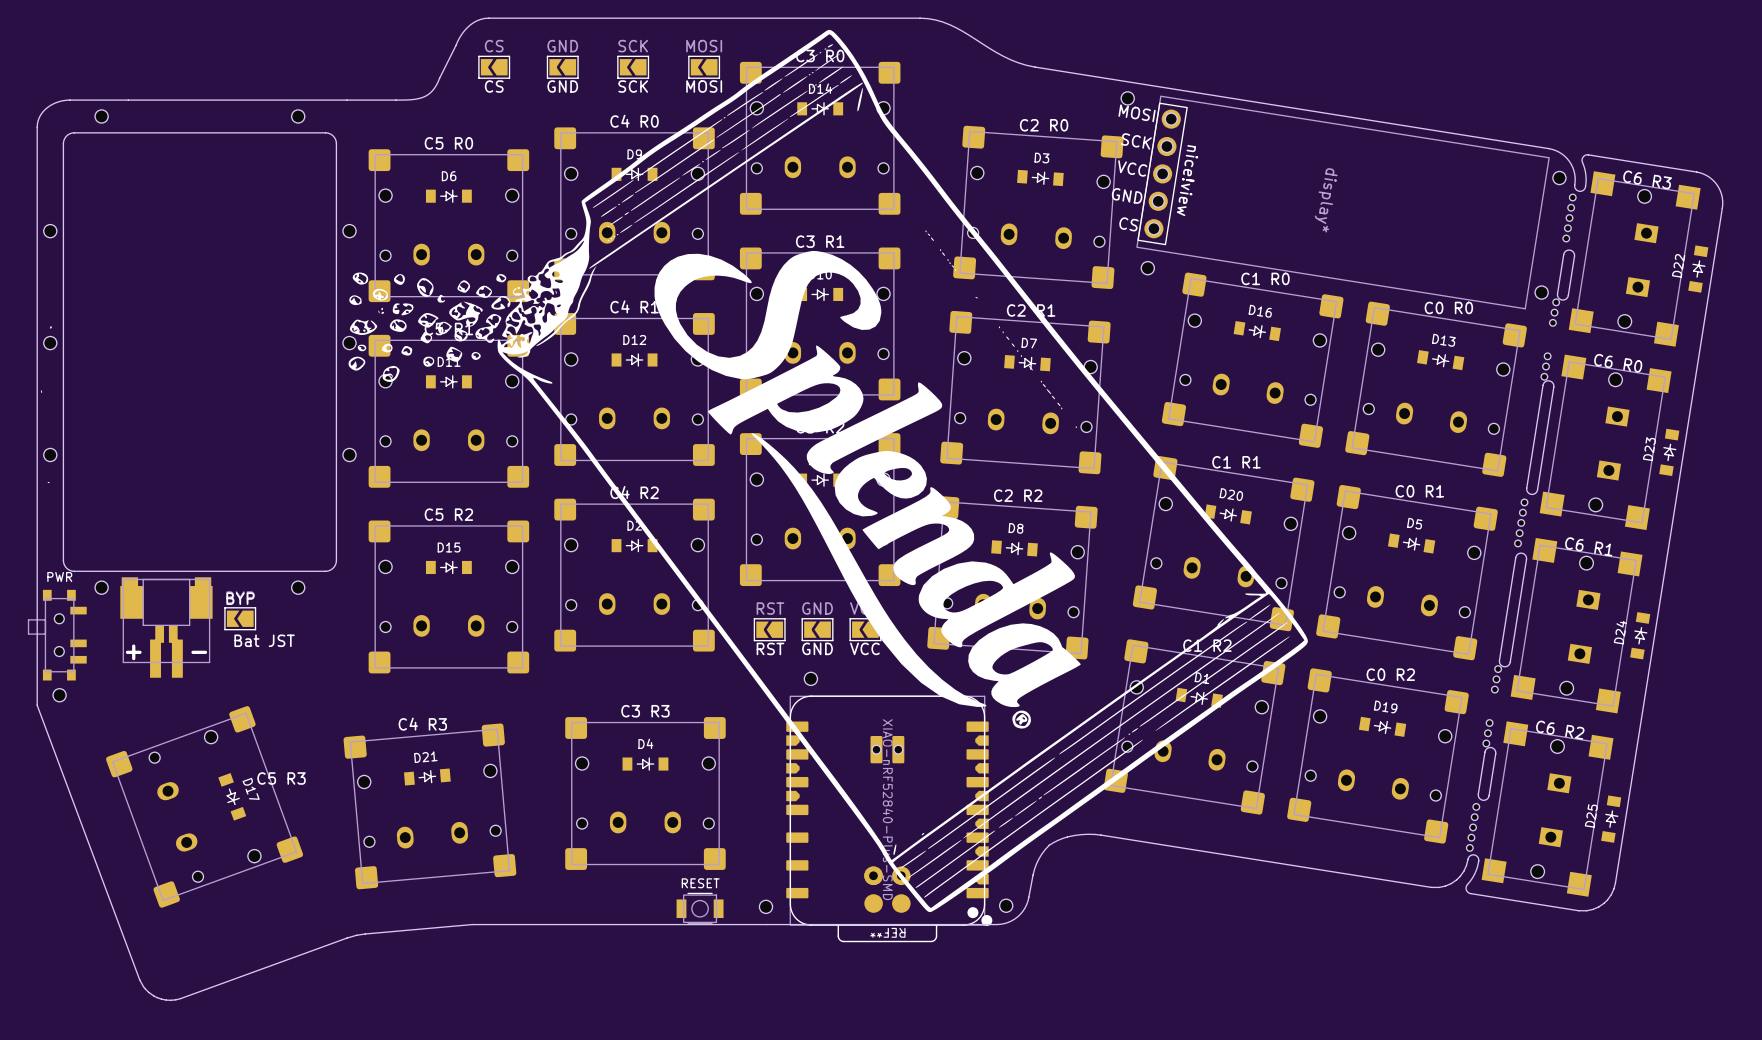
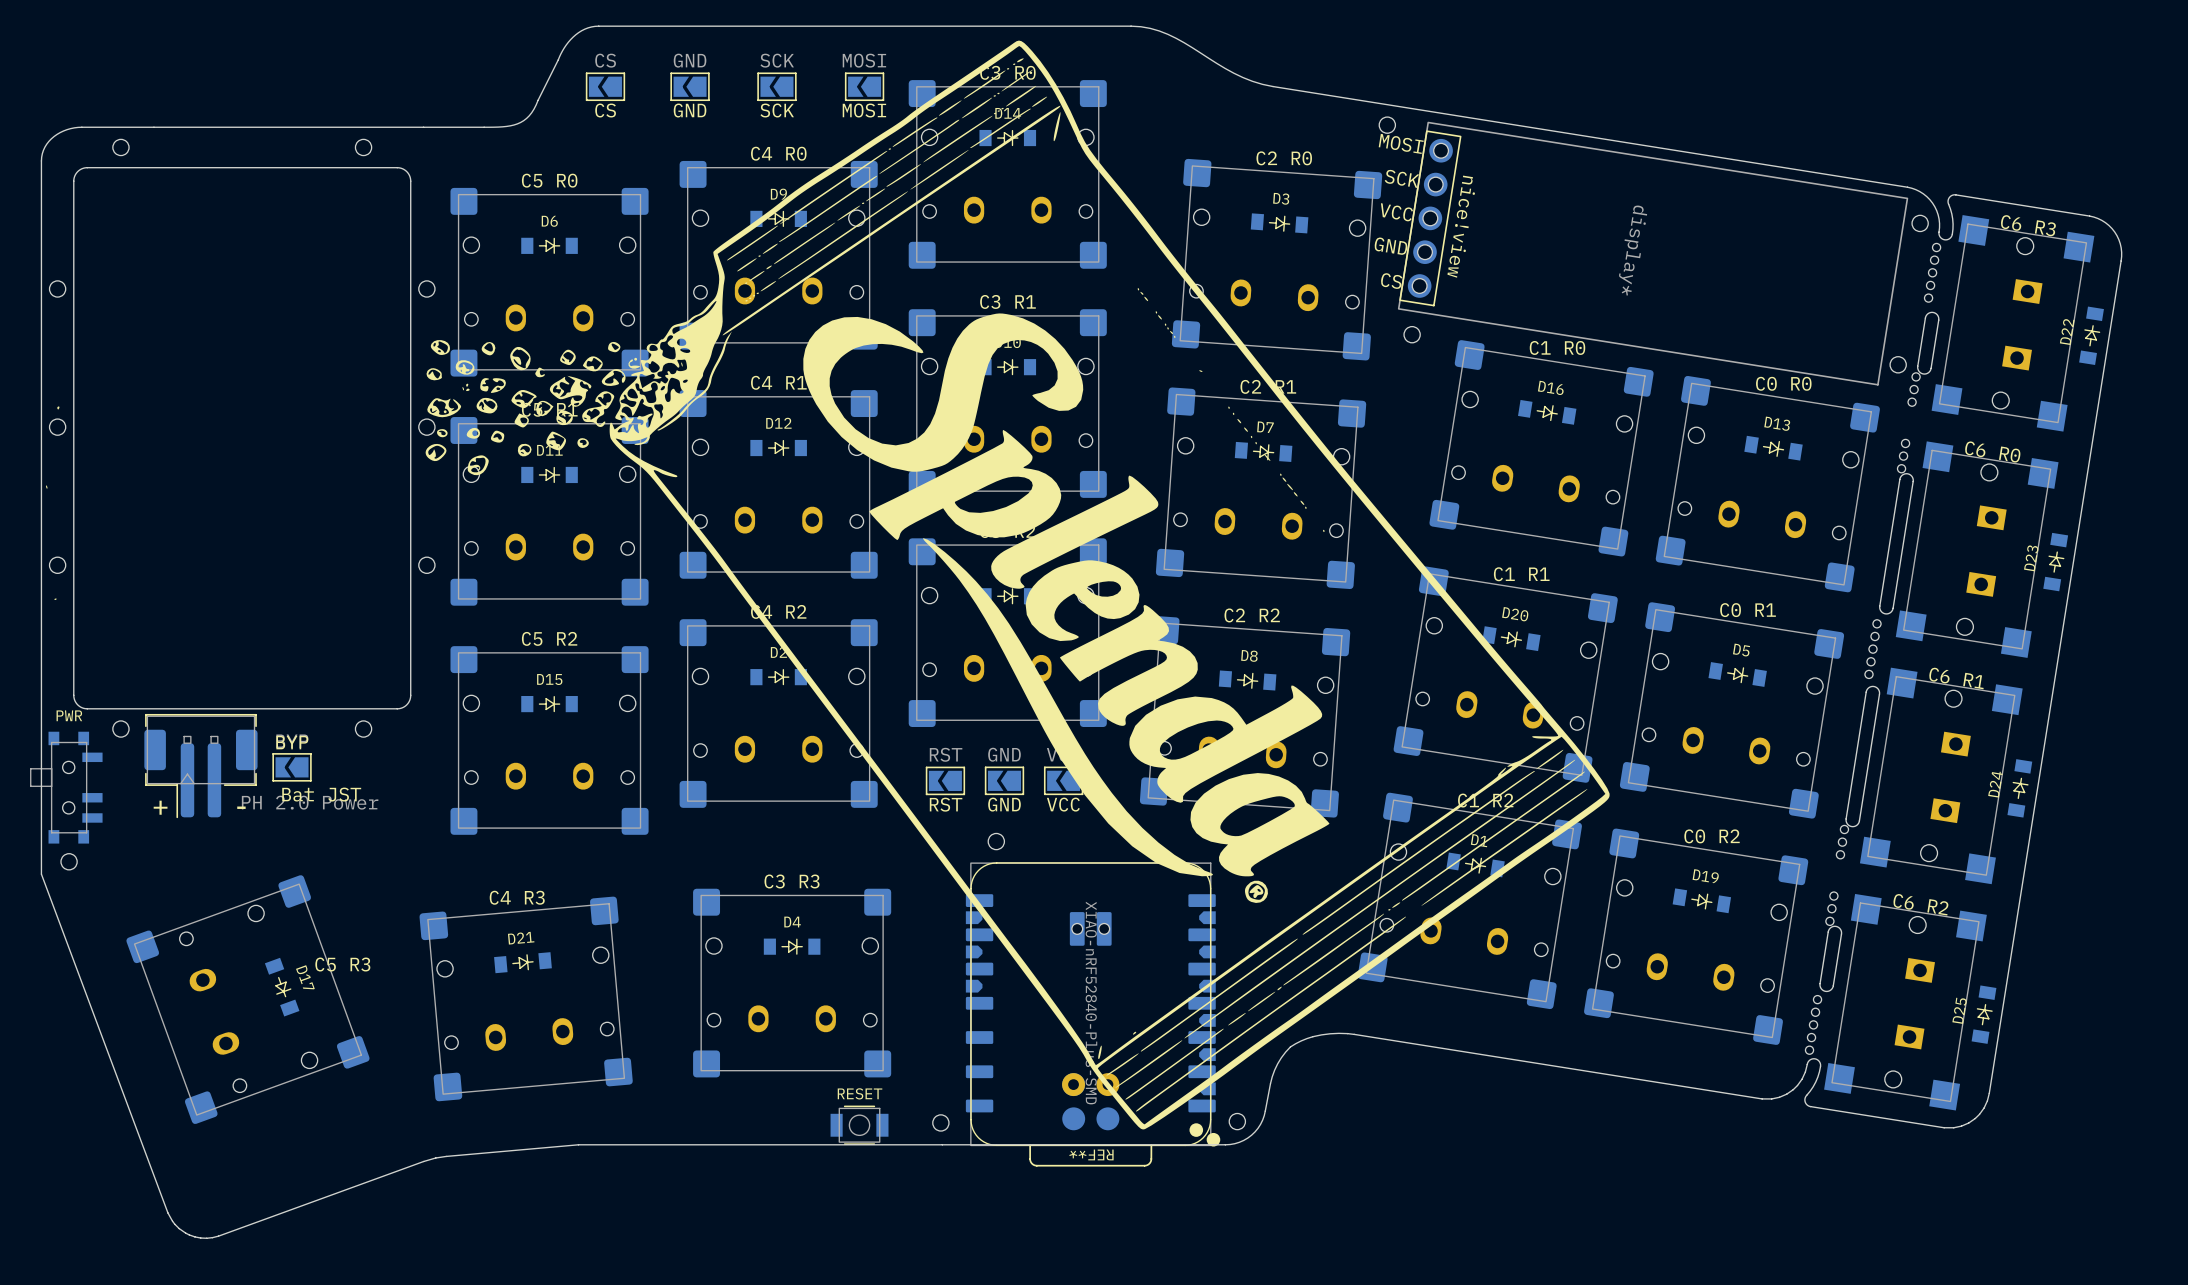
Bat JST footprint: [120, 577, 213, 678] -> [144, 713, 258, 819]
Bat JST value: none -> PH 2.0 Power (310, 802)

